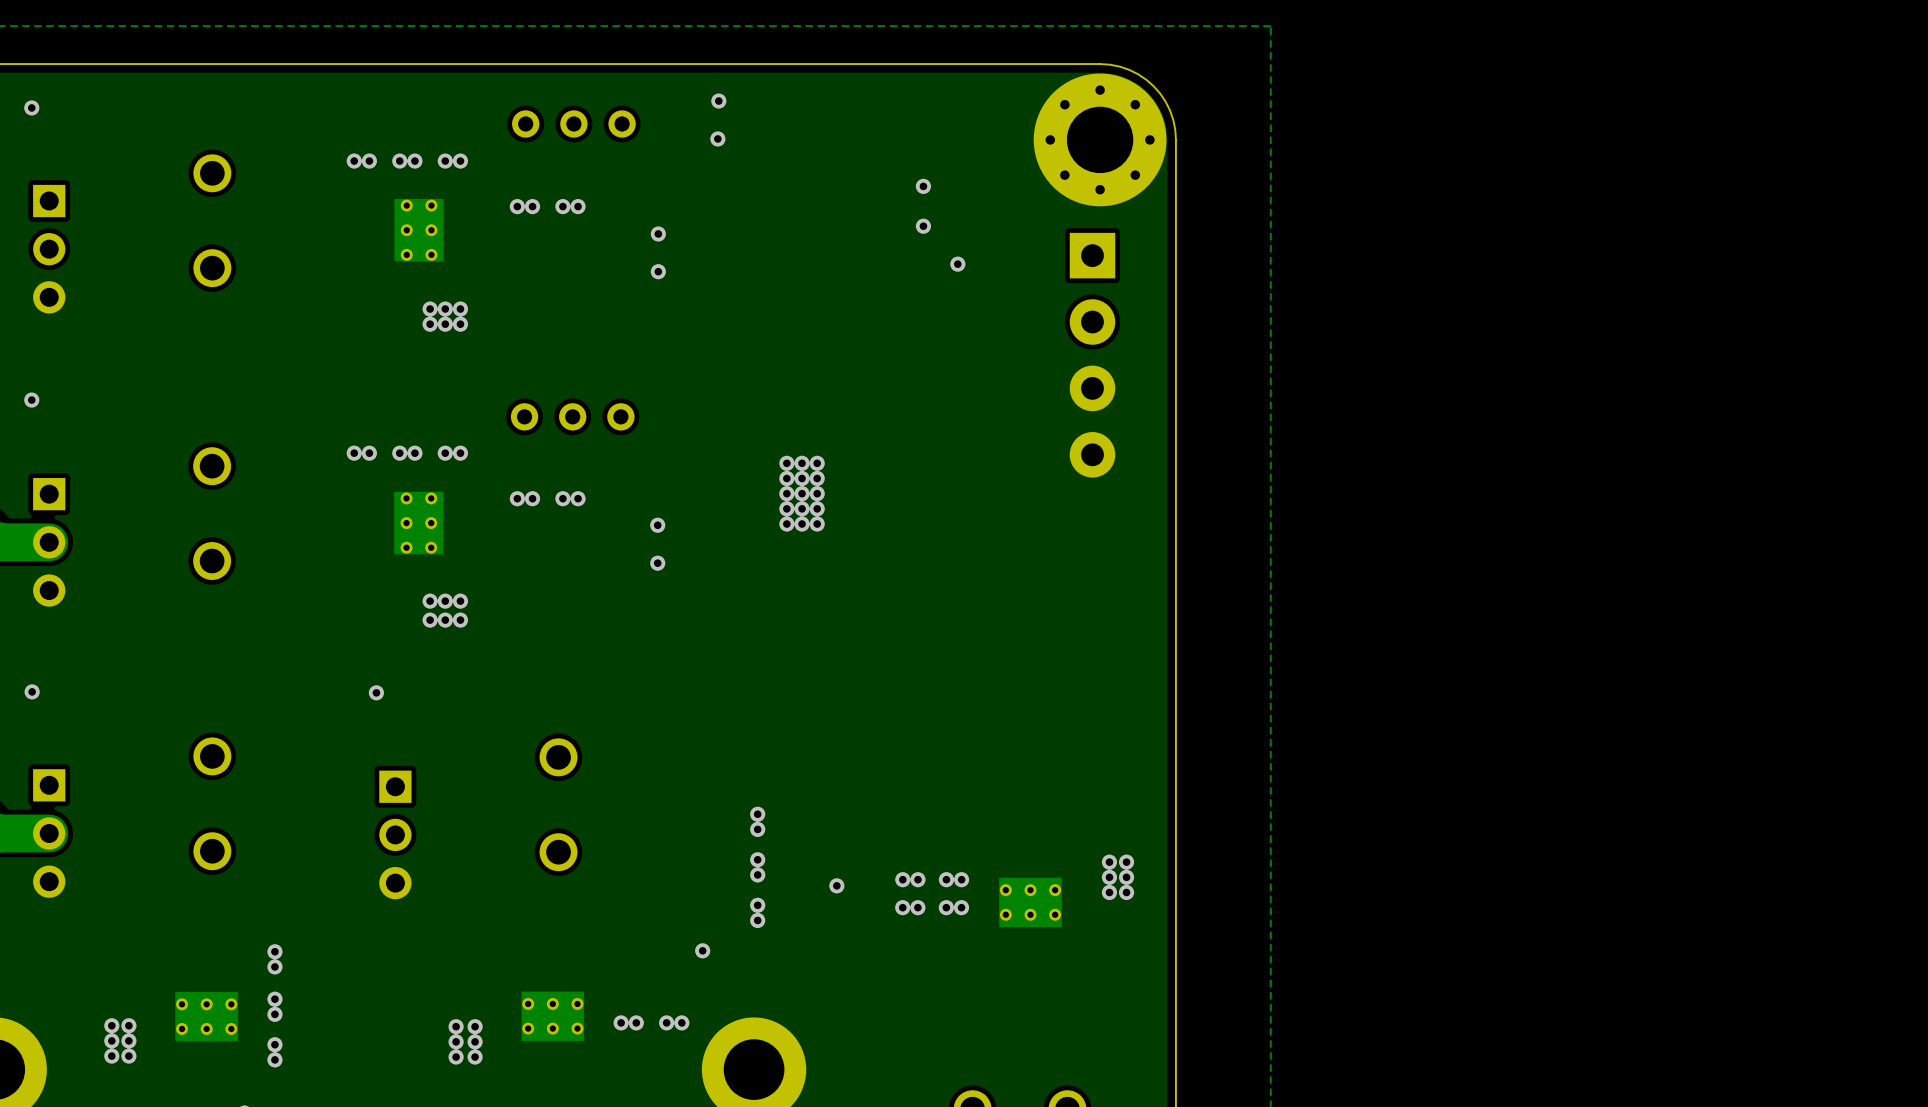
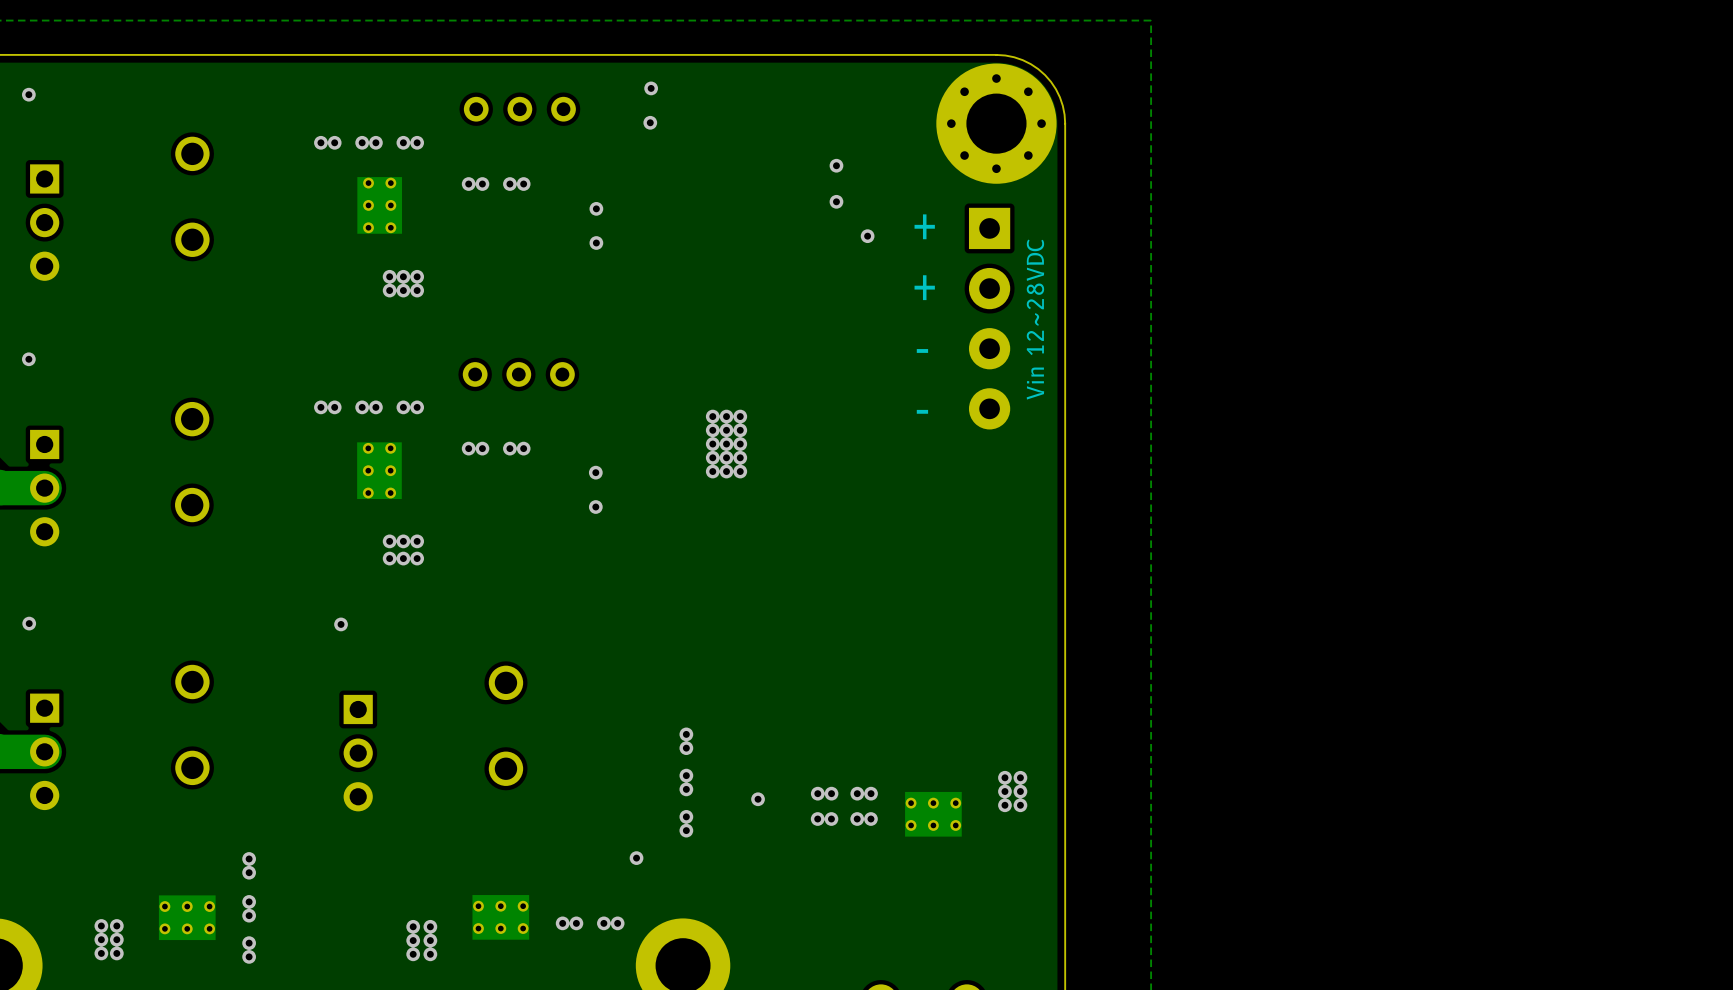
text: none -> + (924, 226)
text: none -> + (924, 287)
text: none -> Vin 12~28VDC (1035, 319)
text: none -> - (922, 350)
text: none -> - (922, 411)

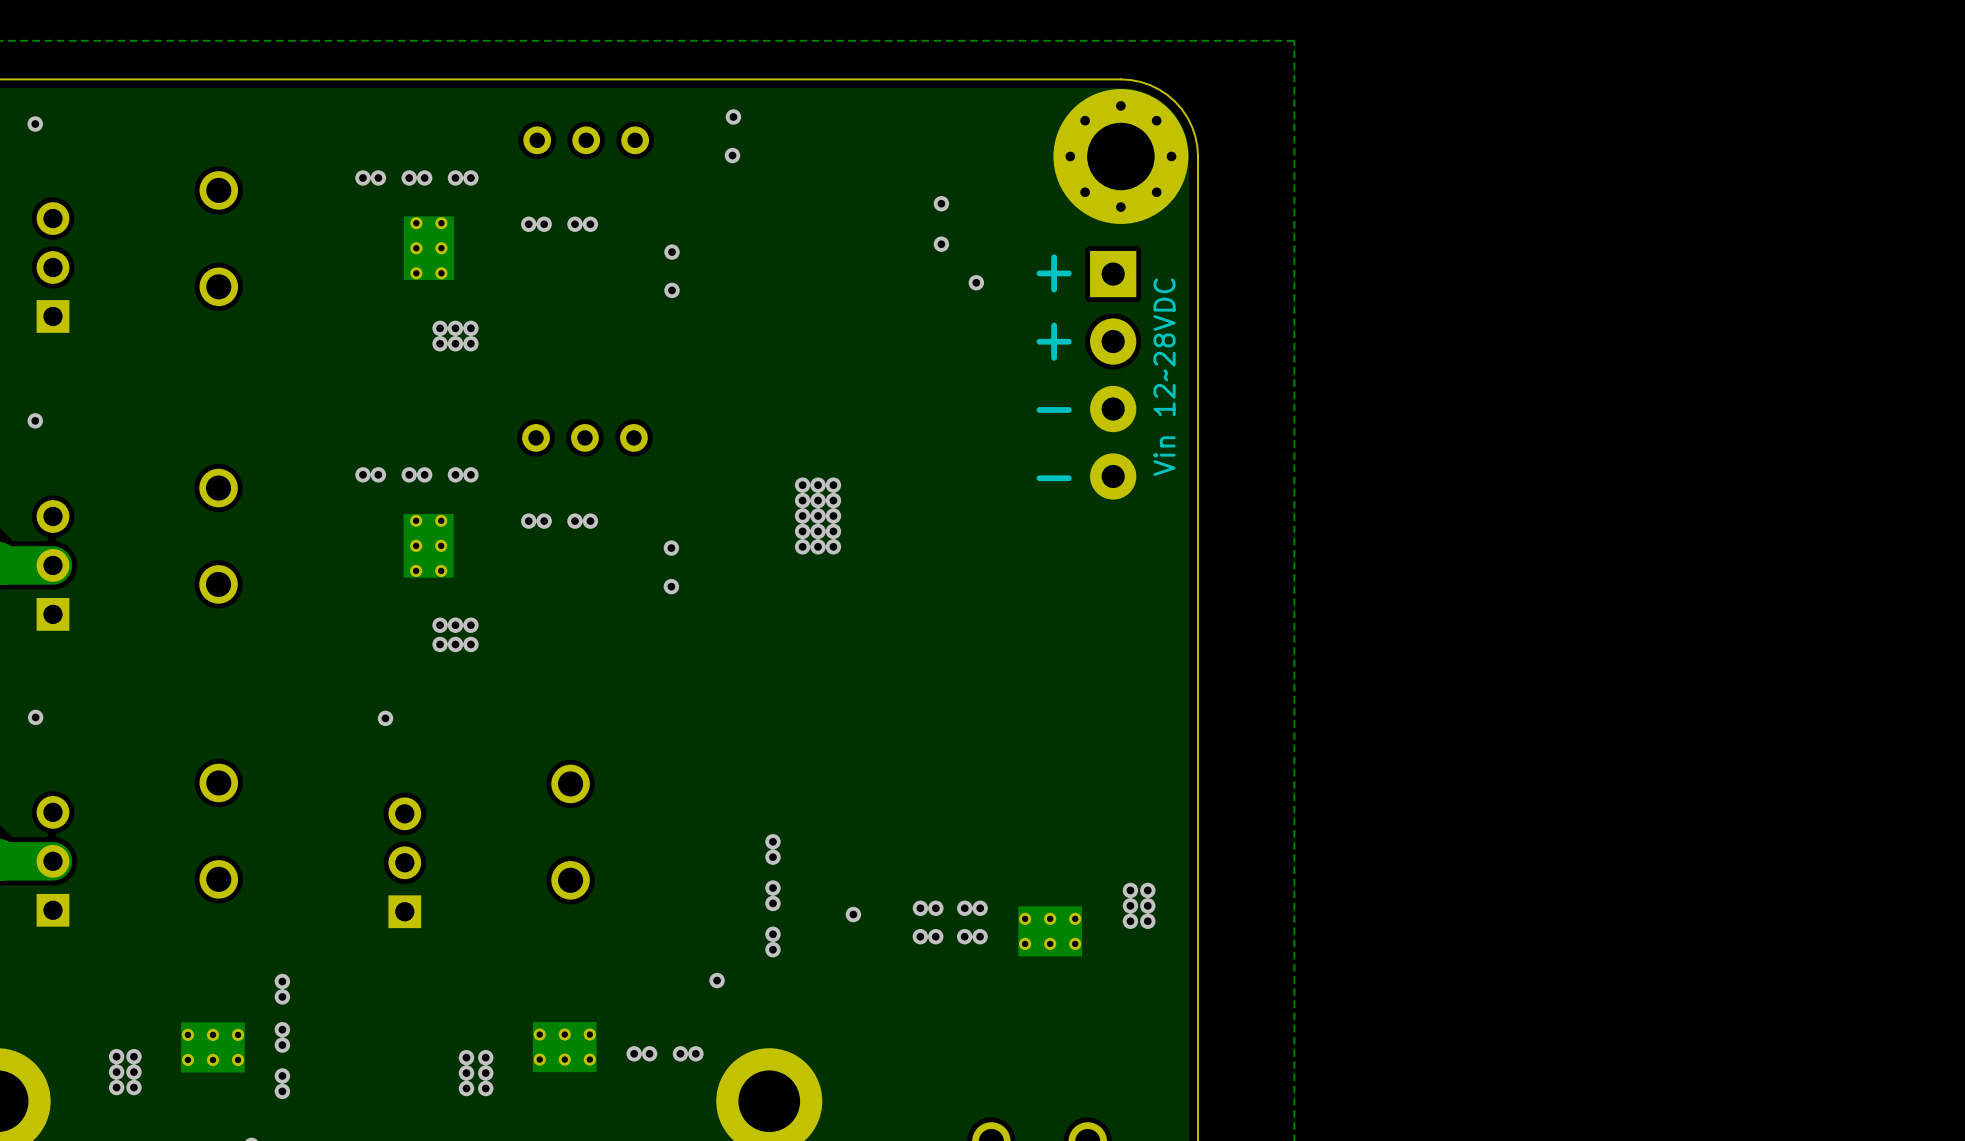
part rotation: 0° (44, 222) -> 180° (53, 267)
part rotation: 0° (44, 488) -> 180° (53, 565)
part rotation: 0° (44, 751) -> 180° (53, 861)
part rotation: 0° (358, 753) -> 180° (404, 862)

